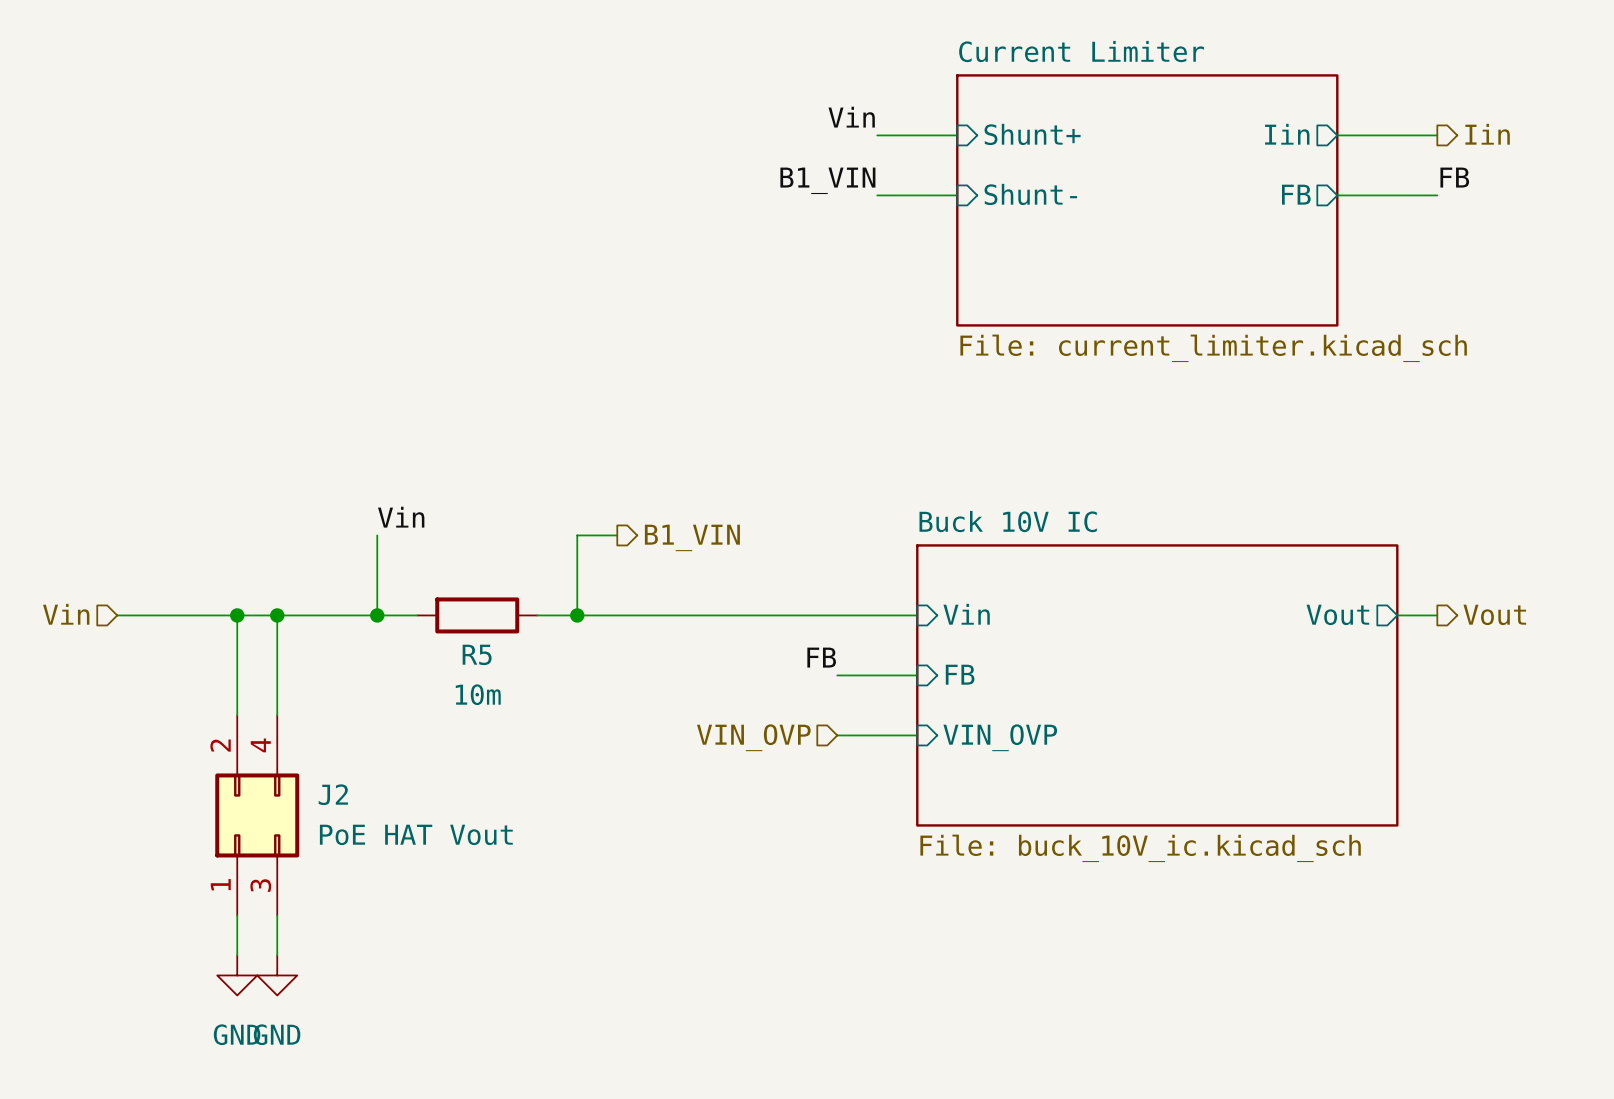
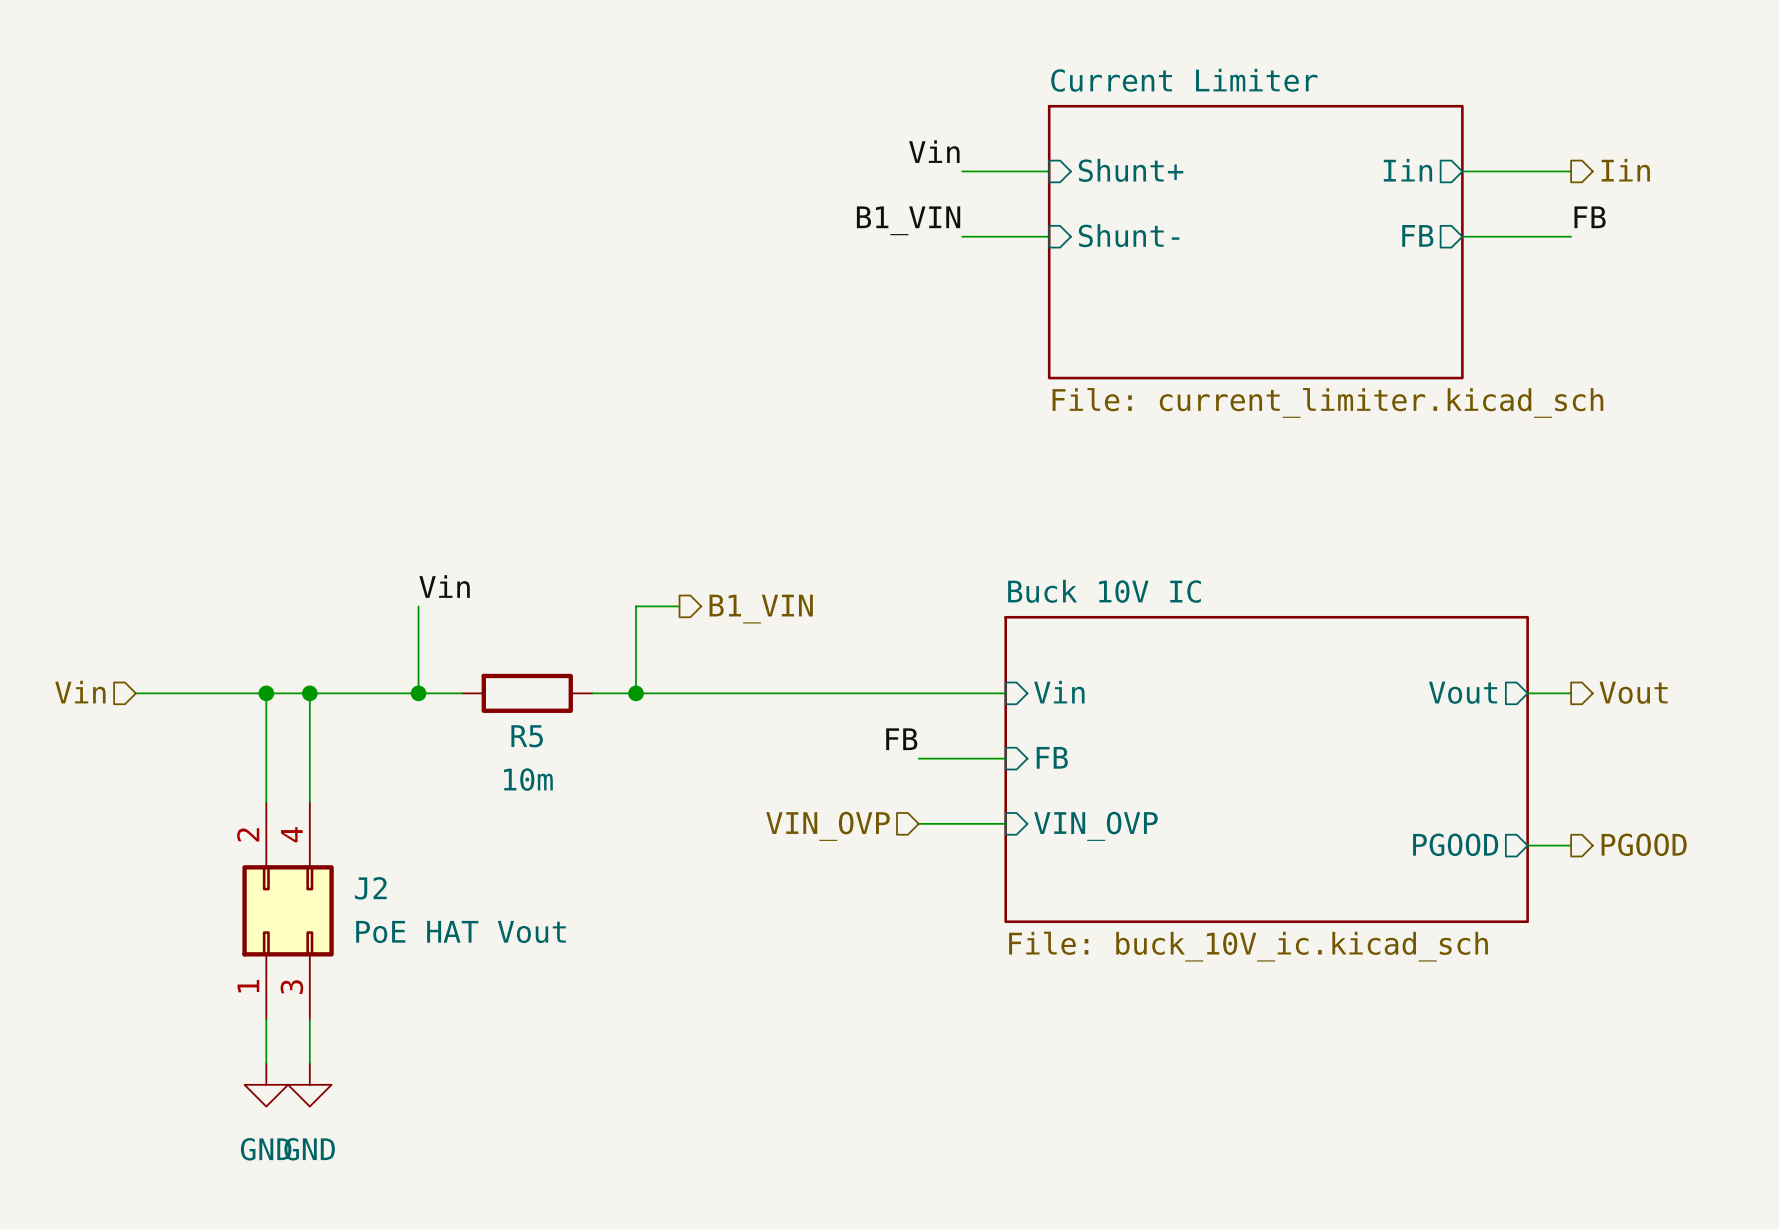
sheet pin: none -> PGOOD (1455, 844)
hierarchical label: none -> PGOOD (1644, 844)
wire: none -> (1527, 845) (1571, 845)

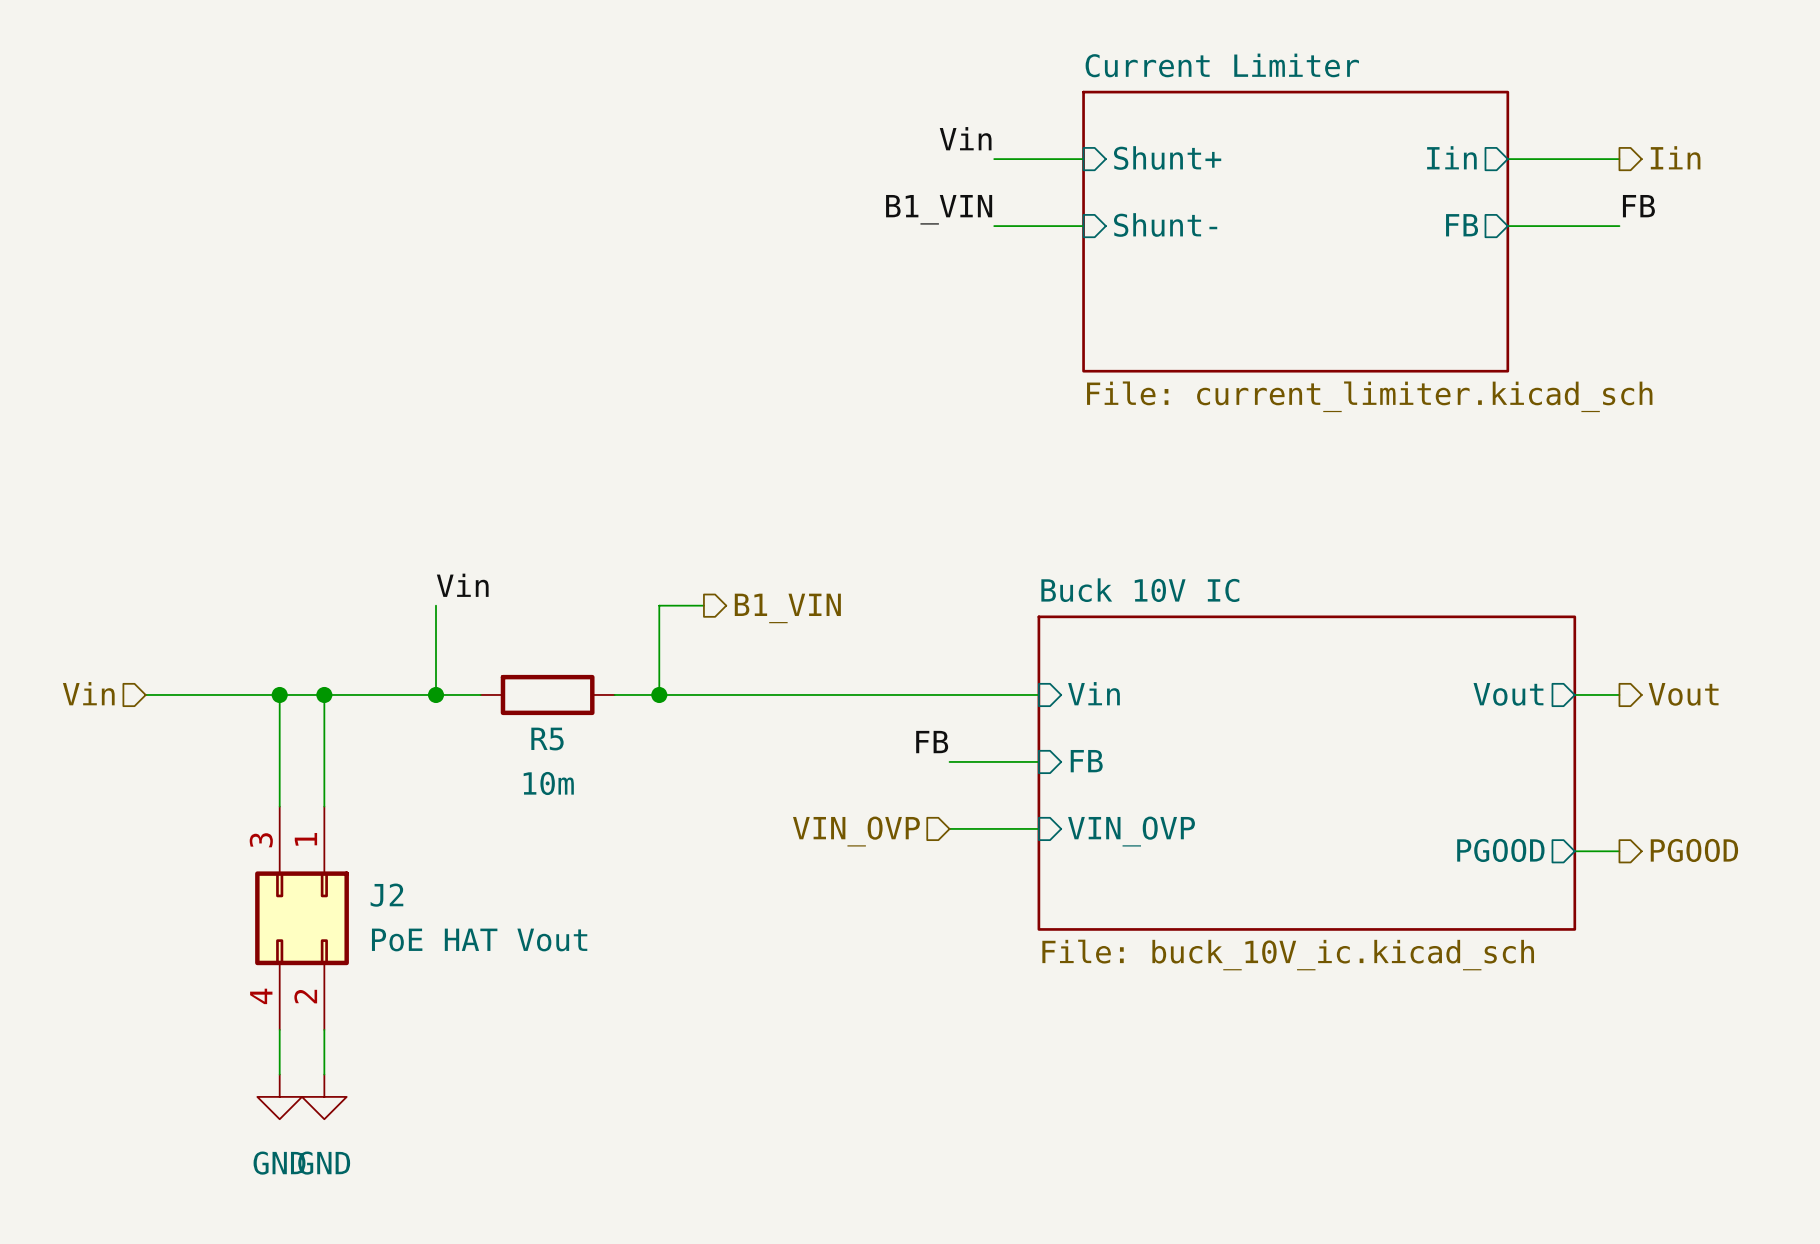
J2 rotation: 0° (288, 910) -> 180° (302, 918)

